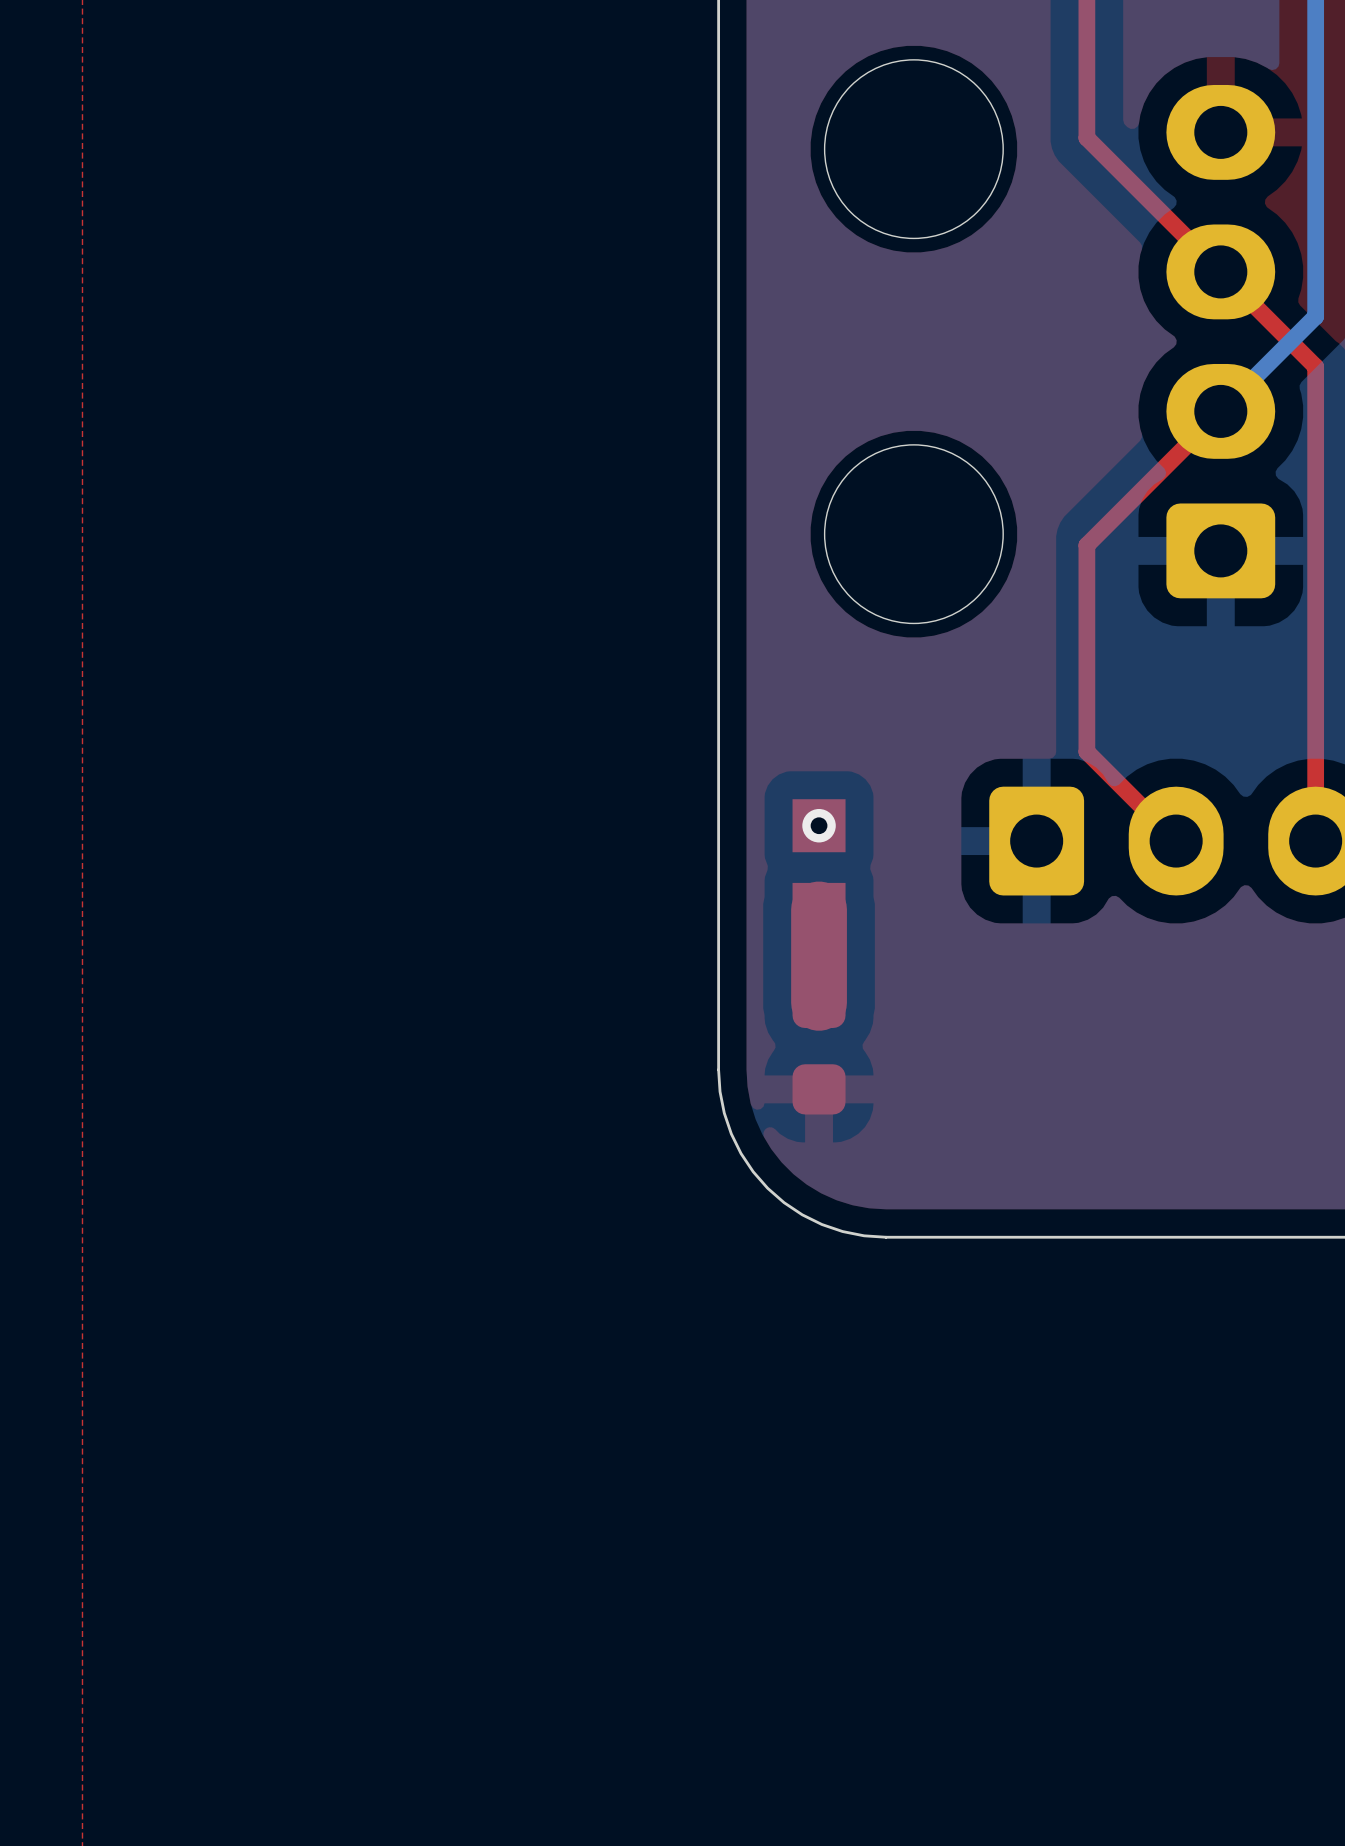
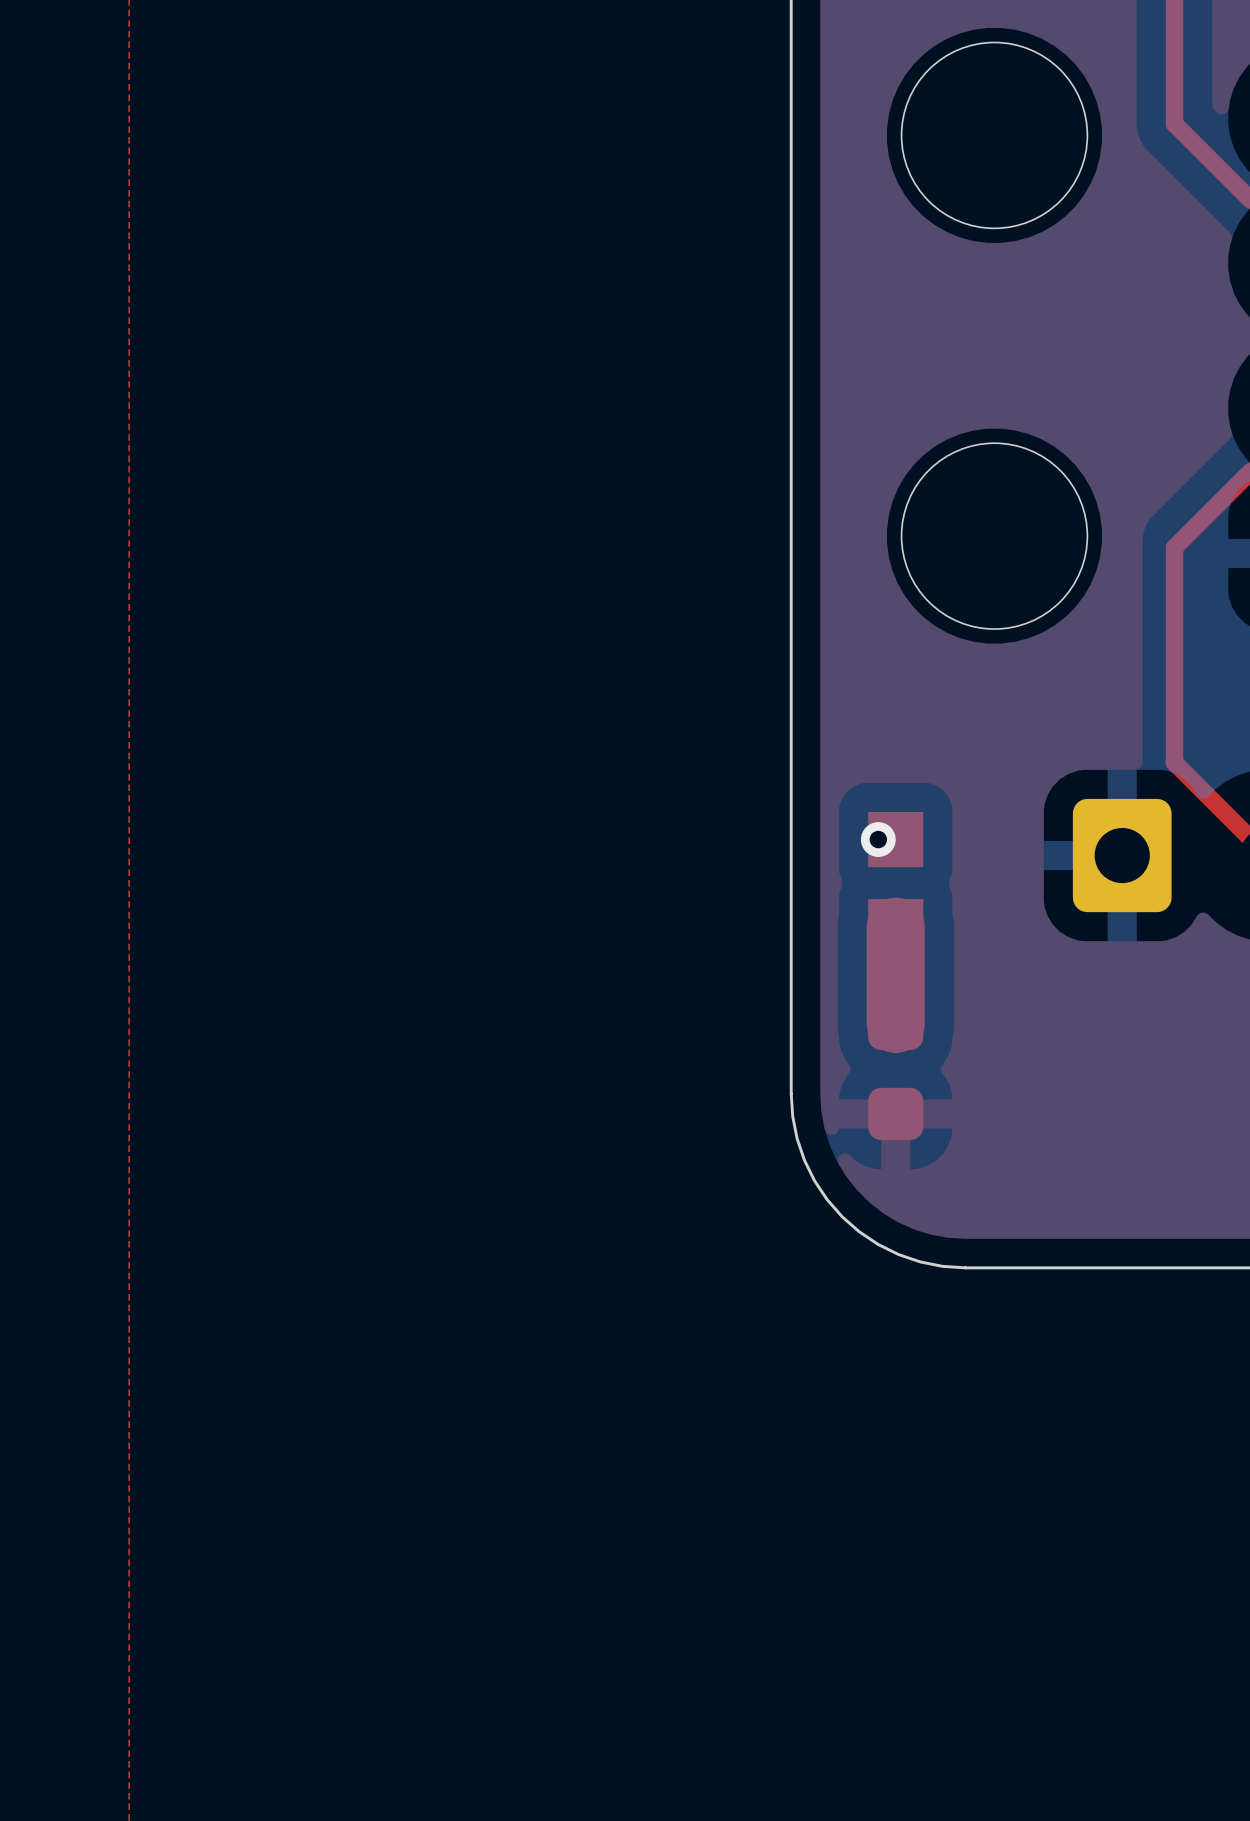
via position: (819, 825) -> (878, 839)

